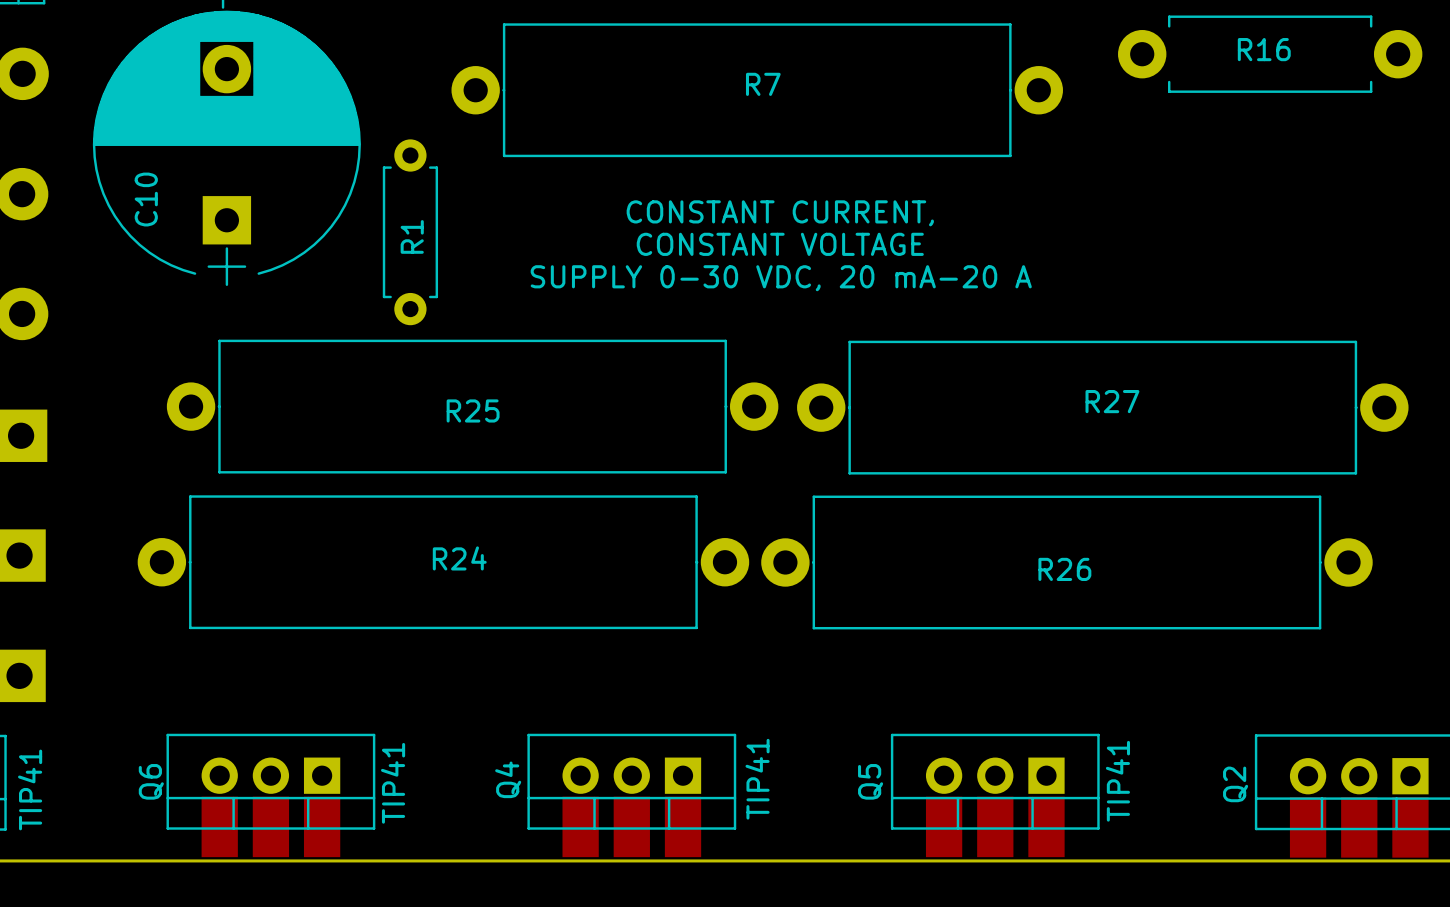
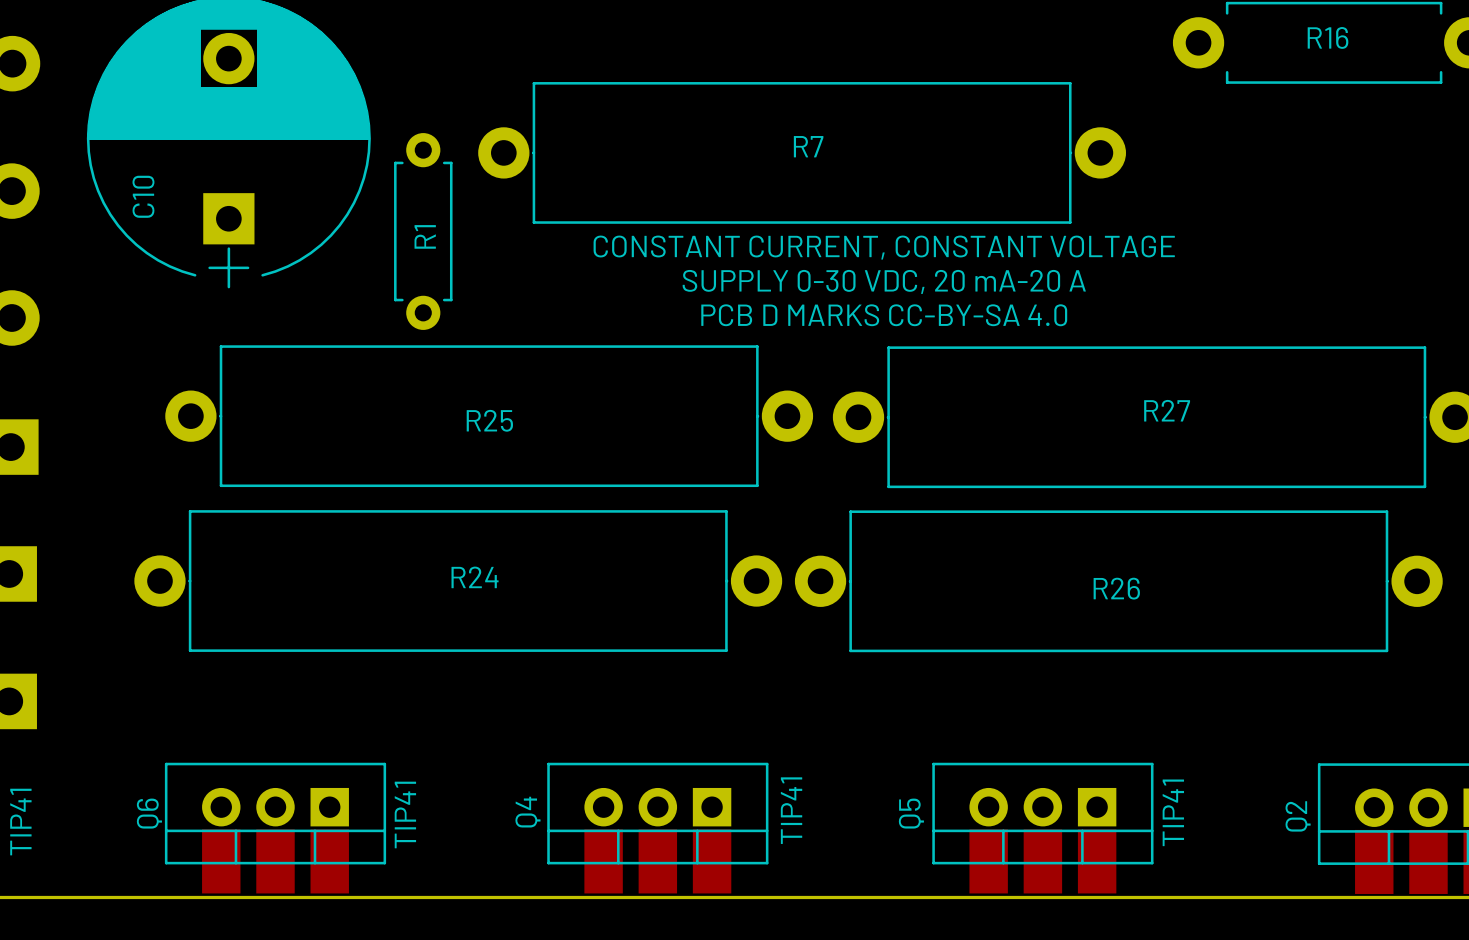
R7 position: (757, 90) -> (802, 152)
text: CONSTANT CURRENT, (780, 213) -> none
text: CONSTANT VOLTAGE (780, 244) -> none
text: none -> CONSTANT CURRENT, CONSTANT VOLTAGE (884, 247)
text position: SUPPLY 0-30 VDC, 20 mA-20 A (781, 278) -> SUPPLY 0-30 VDC, 20 mA-20 A (884, 281)
text: none -> PCB D MARKS CC-BY-SA 4.0 (884, 315)

